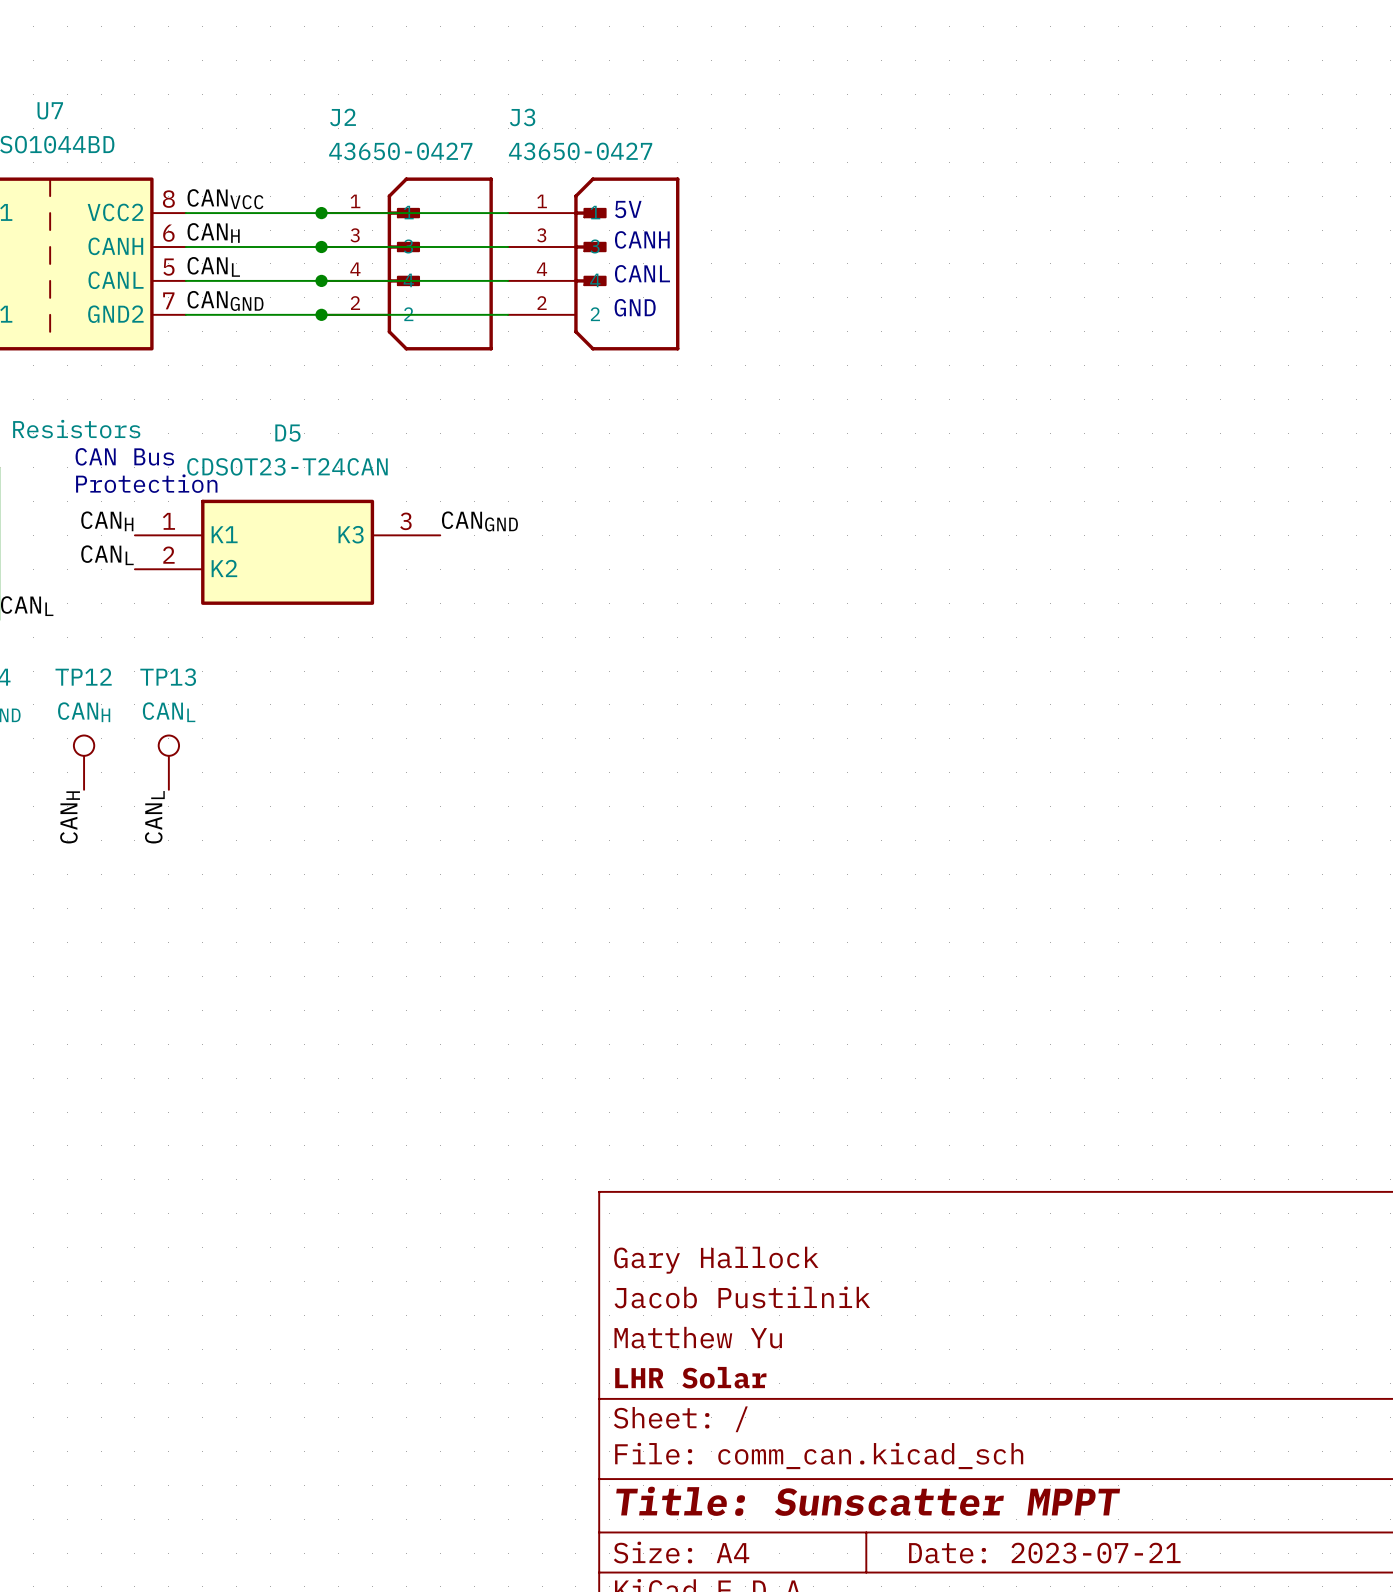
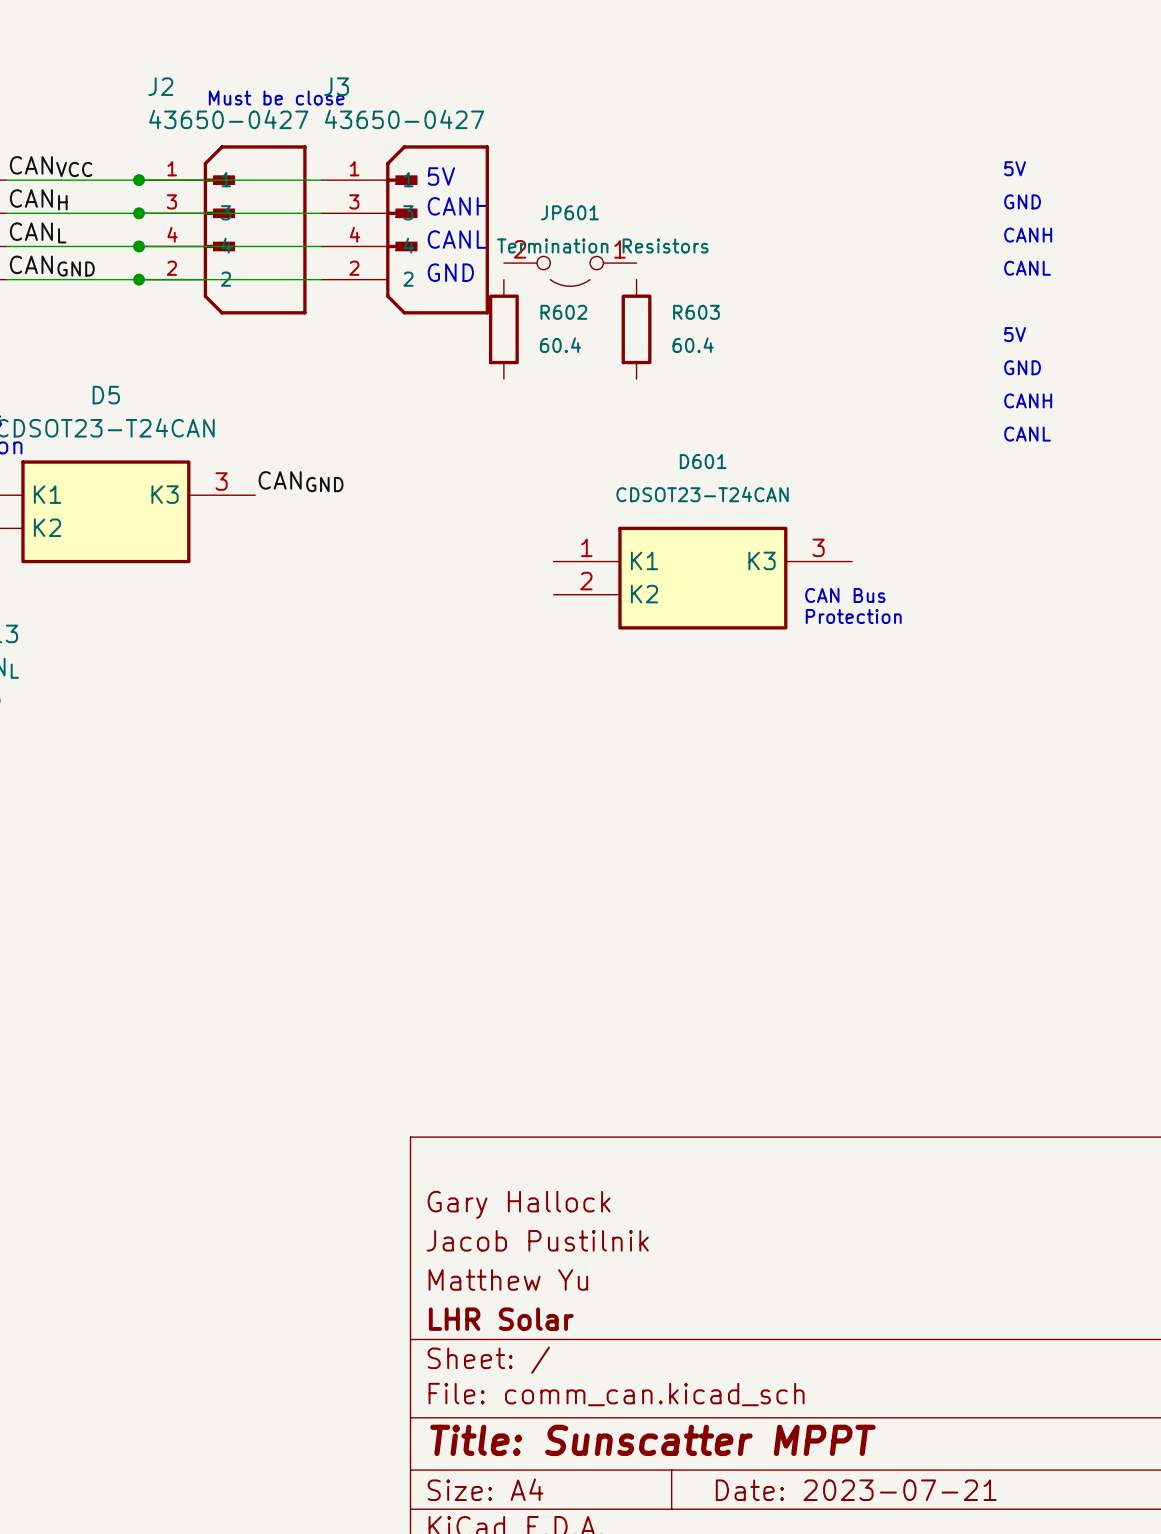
text: none -> Must be close (276, 97)
text: none -> 5V (1015, 168)
text: none -> GND (1022, 201)
text: none -> CANH (1028, 235)
text: none -> CANL (1027, 268)
JP601: none -> Termination Resistors (570, 271)
R602: none -> 60.4 (503, 329)
R603: none -> 60.4 (636, 329)
text: none -> 5V (1015, 334)
text: none -> GND (1022, 367)
text: none -> CANH (1028, 400)
text: none -> CANL (1027, 434)
D601: none -> CDSOT23-T24CAN (702, 578)
text: none -> CAN Bus (845, 595)
text: none -> Protection (853, 616)

